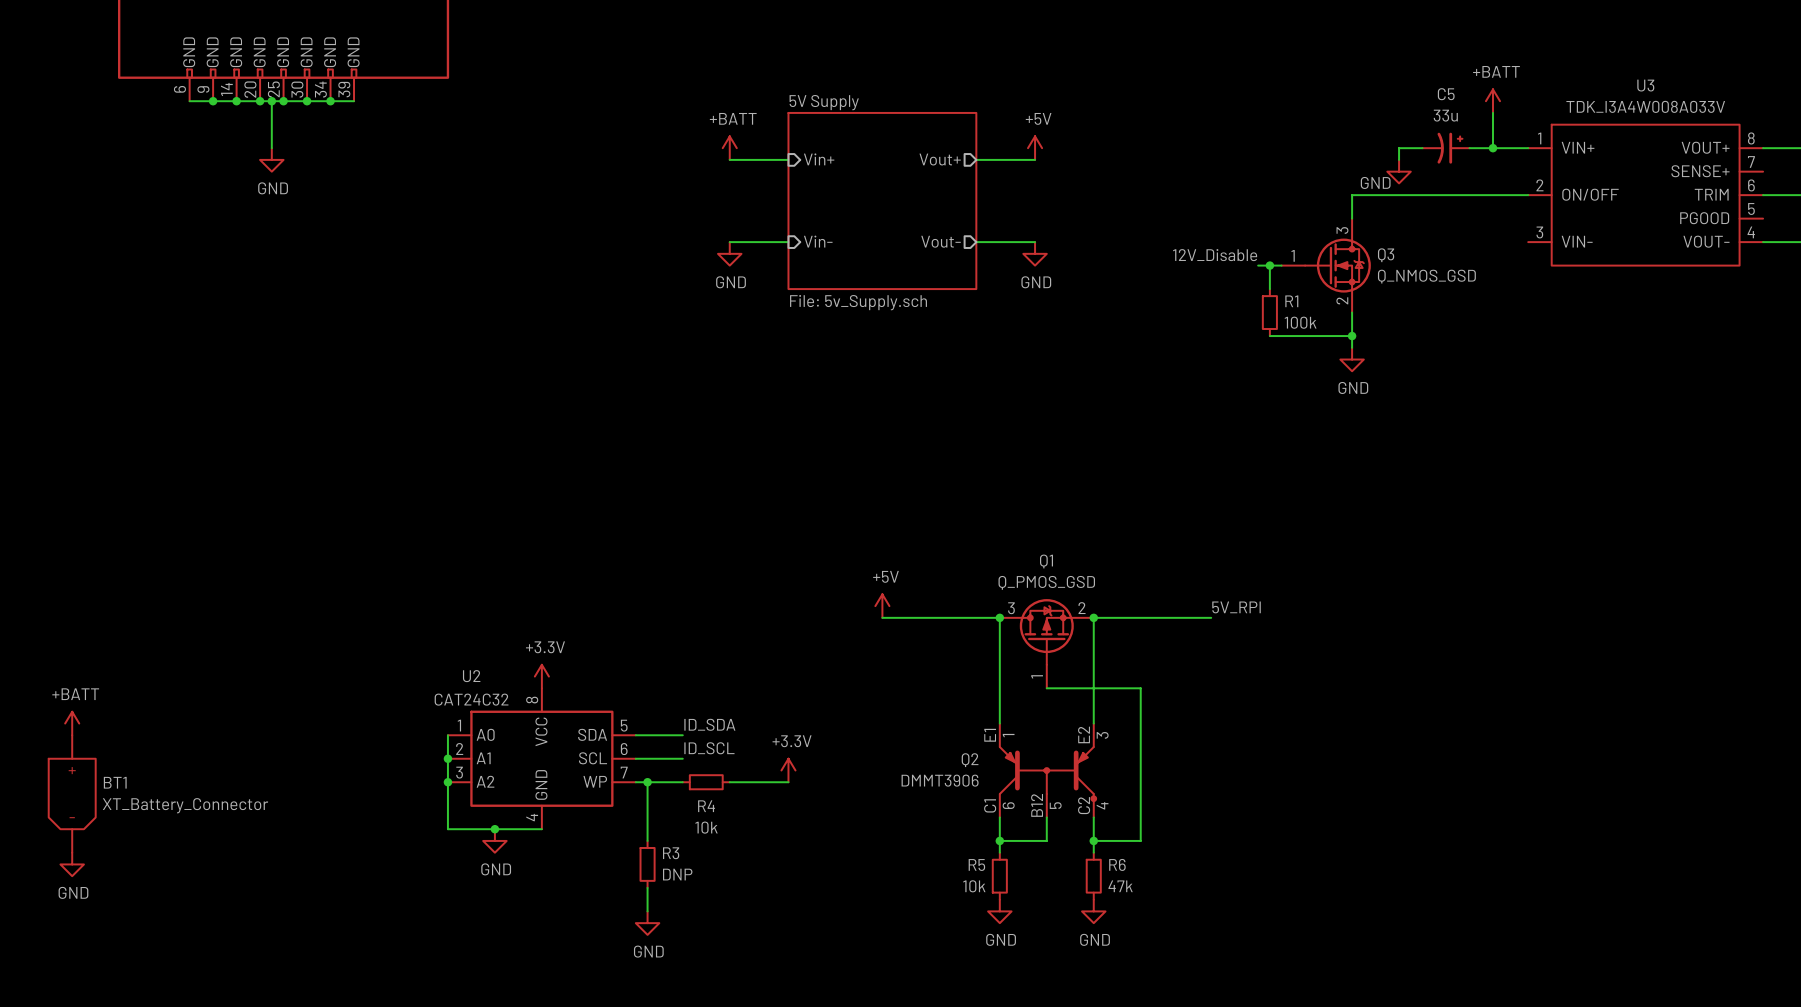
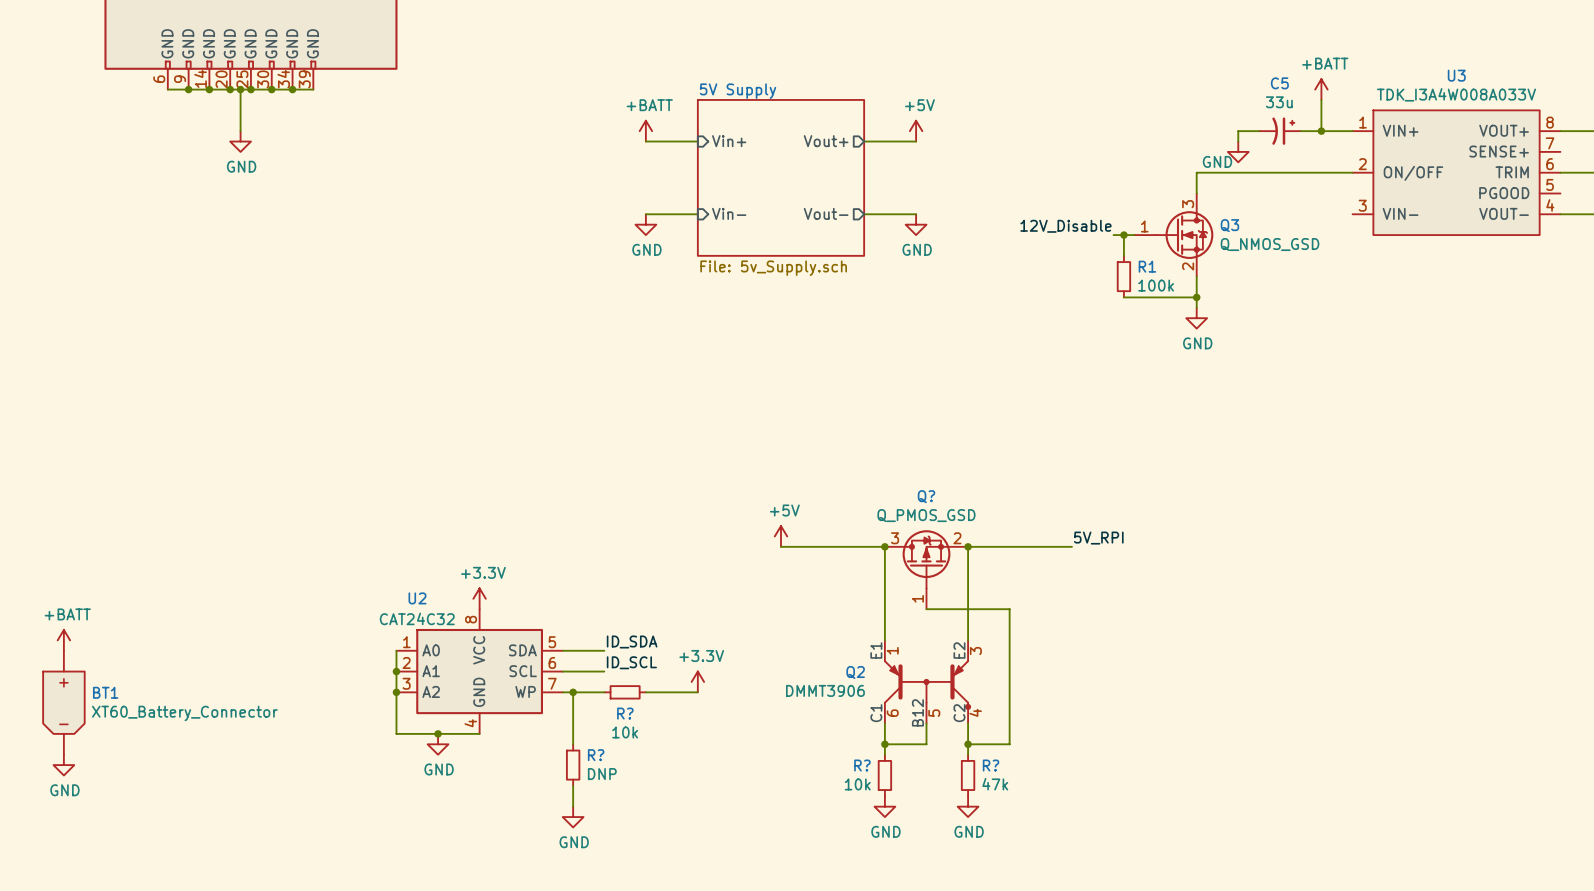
Q1 name: Q1 (1046, 561) -> Q? (926, 496)
BT1 value: XT_Battery_Connector (185, 805) -> XT60_Battery_Connector (184, 713)
R4 name: R4 (706, 806) -> R? (625, 713)
R3 name: R3 (671, 853) -> R? (596, 755)
R5 name: R5 (976, 864) -> R? (862, 765)
R6 name: R6 (1117, 864) -> R? (991, 765)

